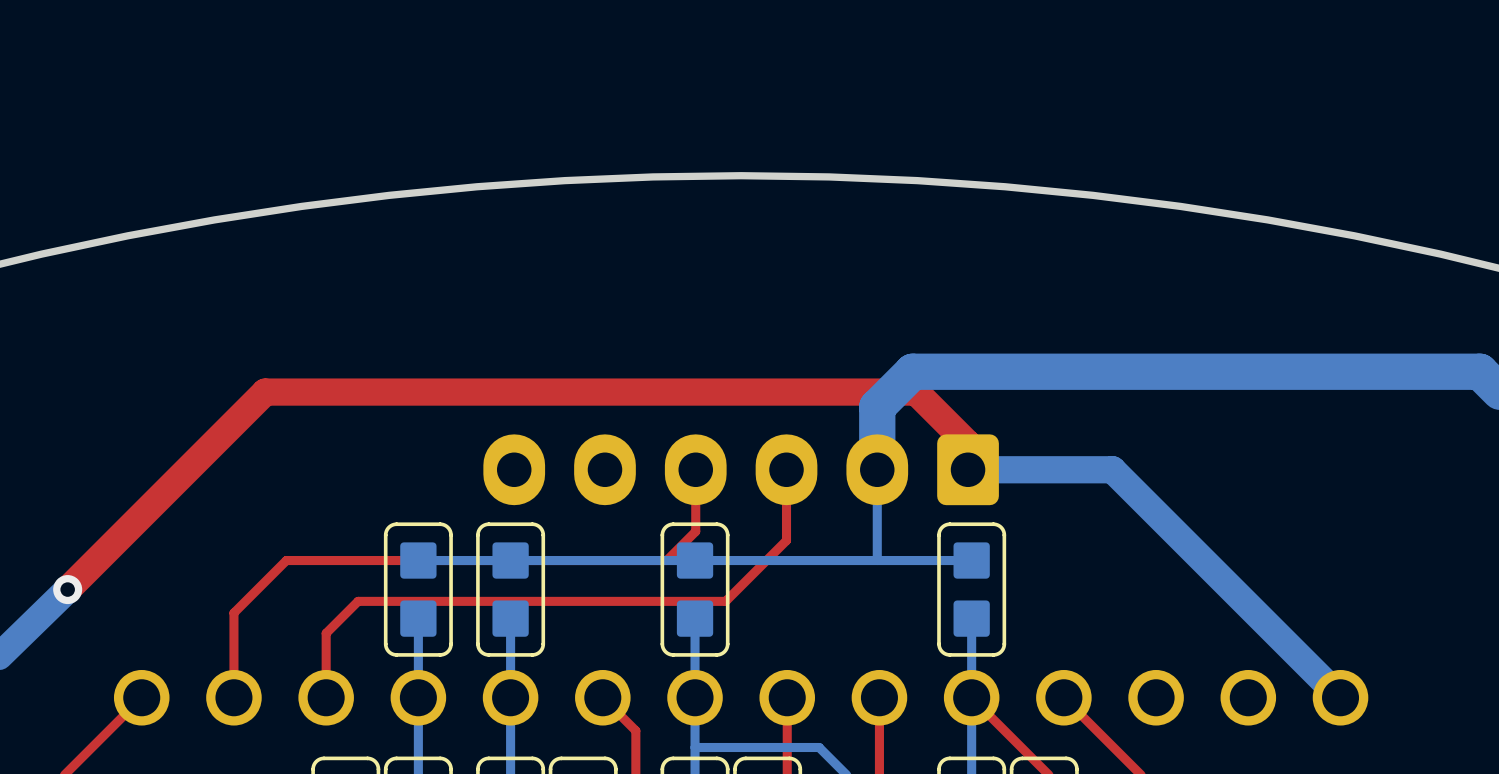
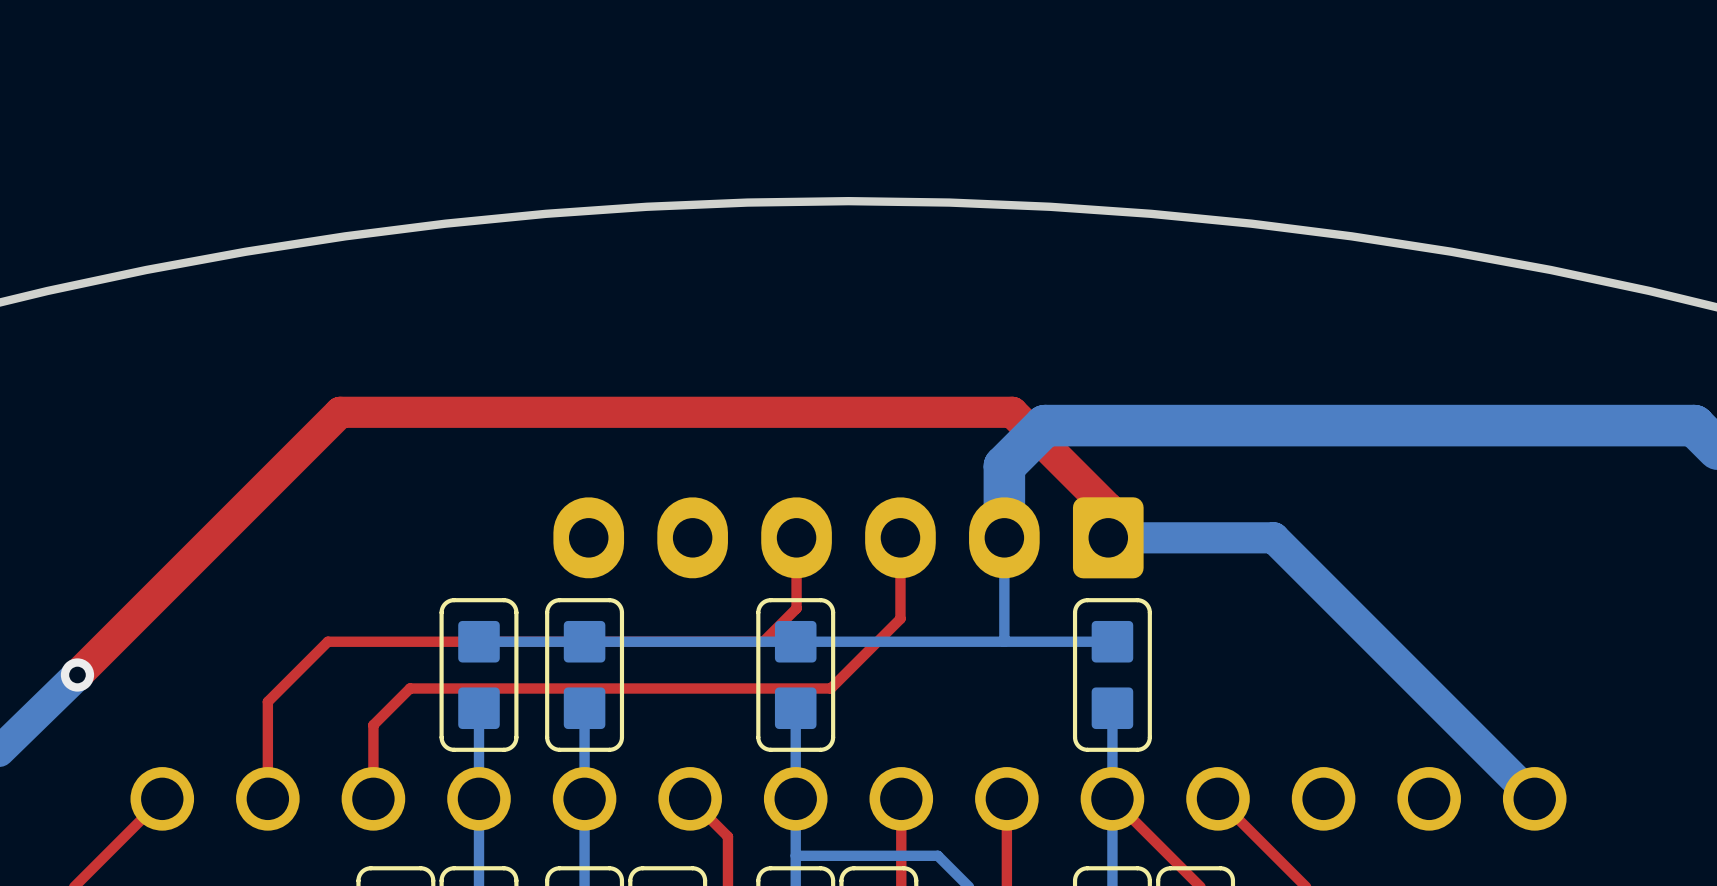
top track: (916, 392) (265, 392) -> (1048, 448) (1012, 412) (340, 412) (303, 448)

